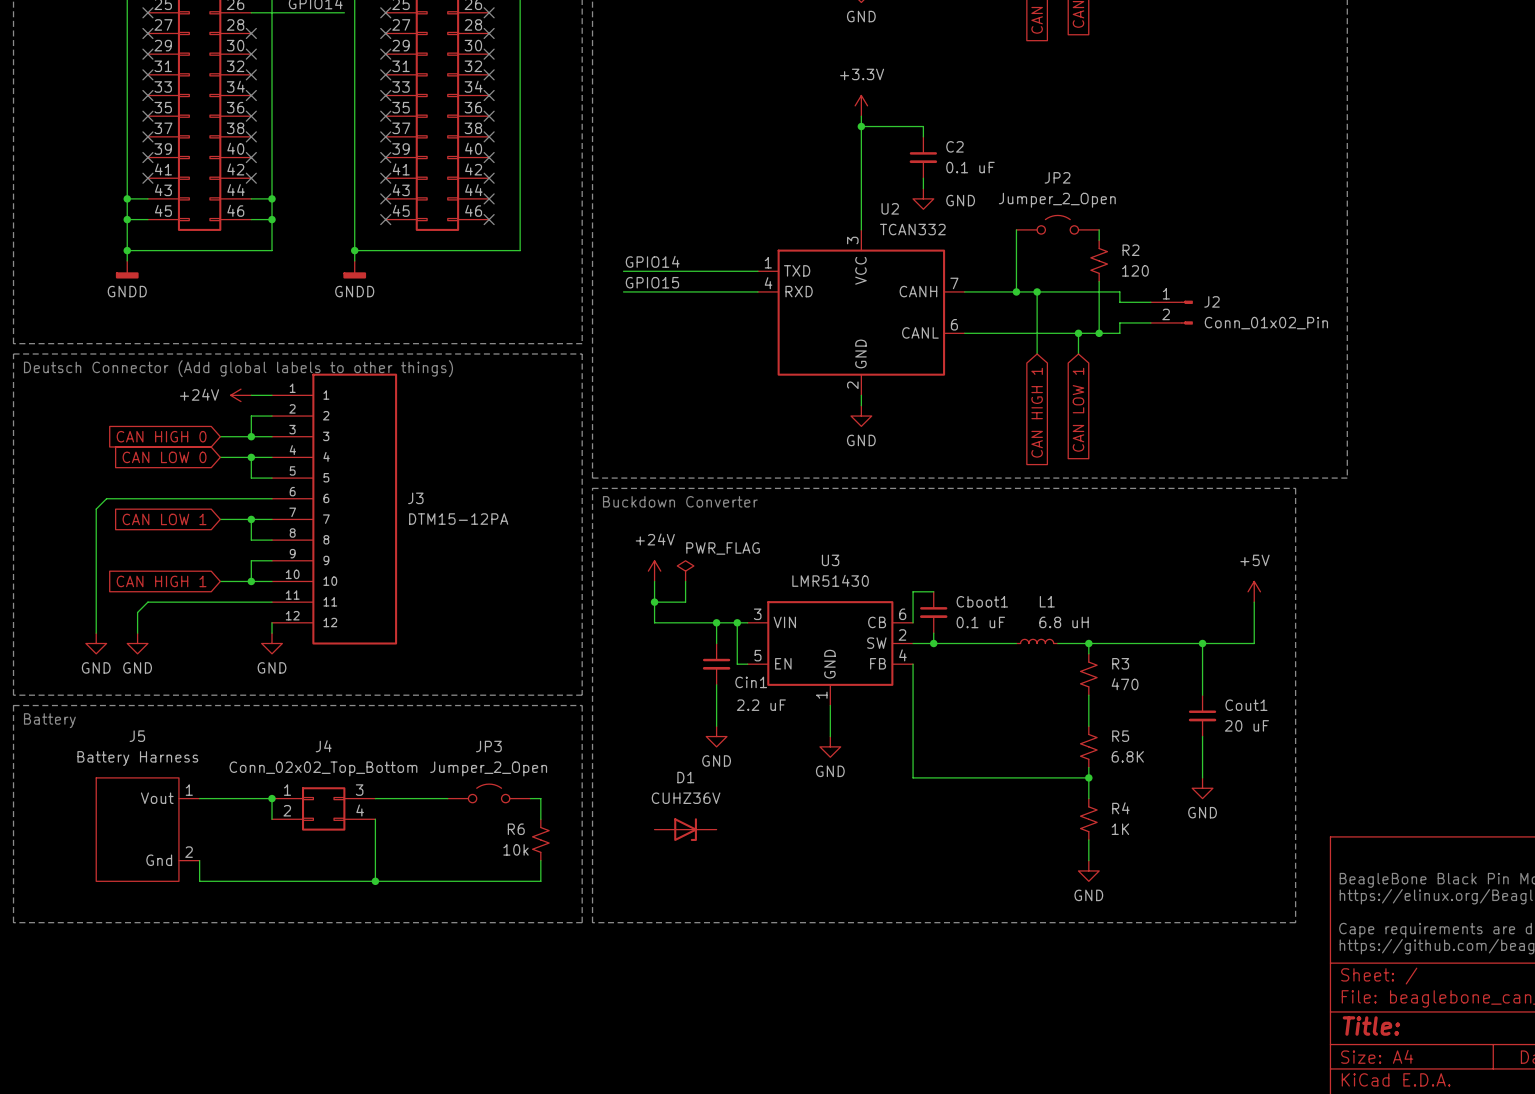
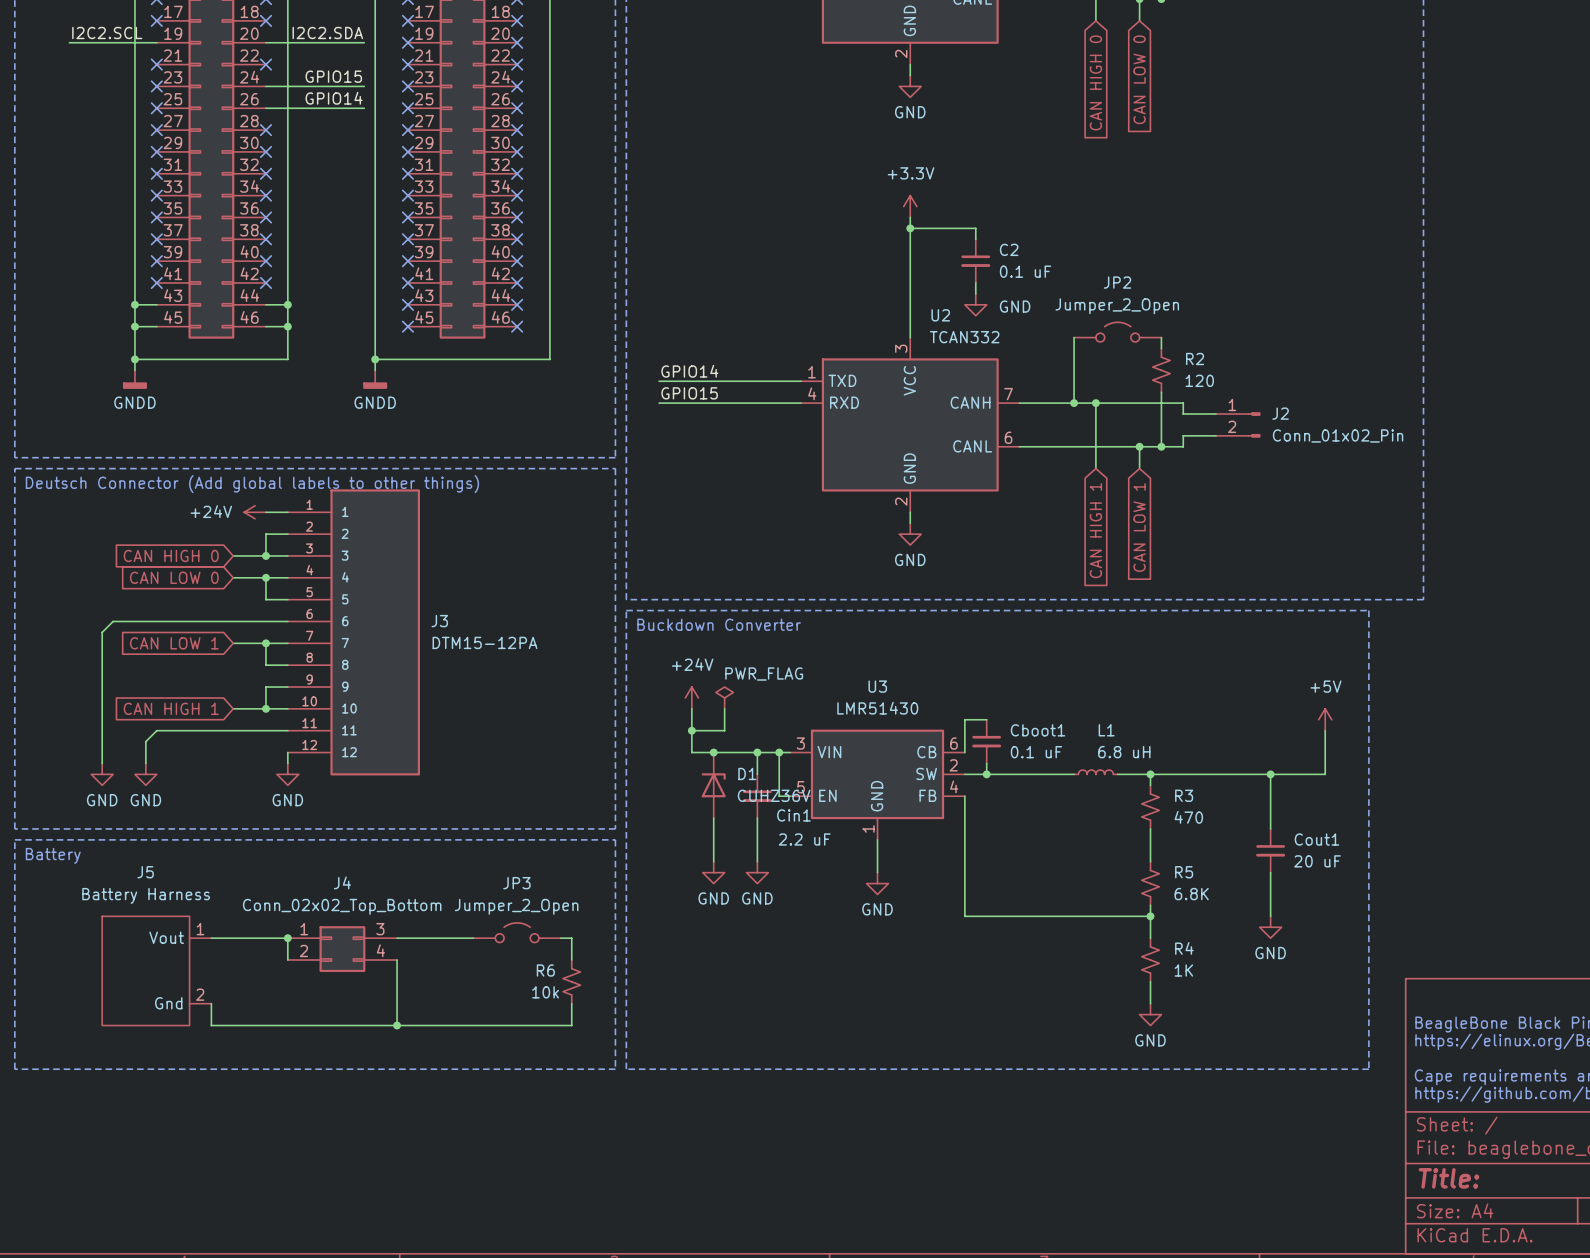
junction: none -> (713, 752)
wire: none -> (713, 818) (713, 861)
power symbol: none -> GND (713, 872)
D1 name position: D1 (685, 777) -> D1 (747, 773)
D1 value position: CUHZ36V (686, 798) -> CUHZ36V (774, 795)
D1 rotation: 0° (685, 829) -> 90° counterclockwise (713, 785)
D1 position: (685, 829) -> (713, 785)

